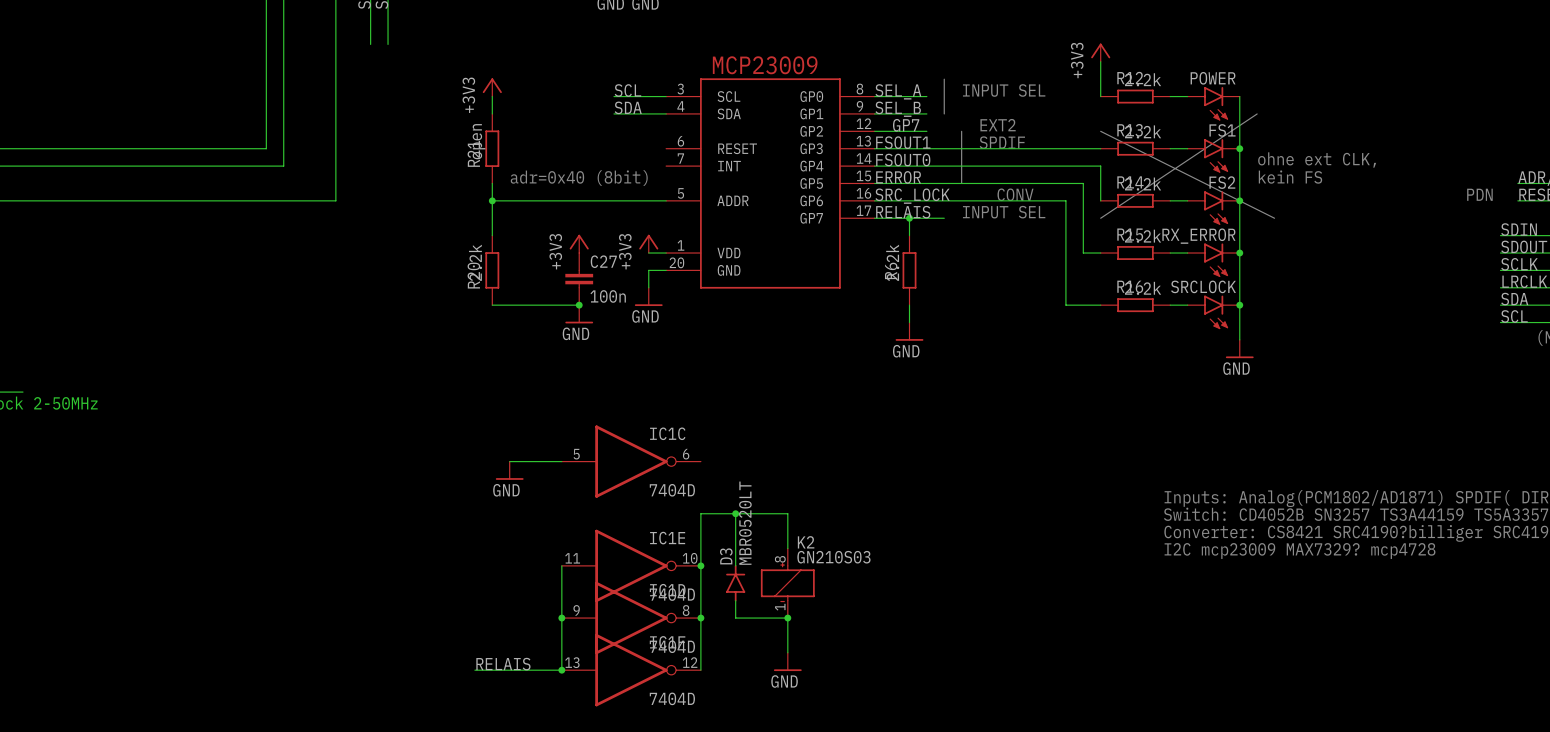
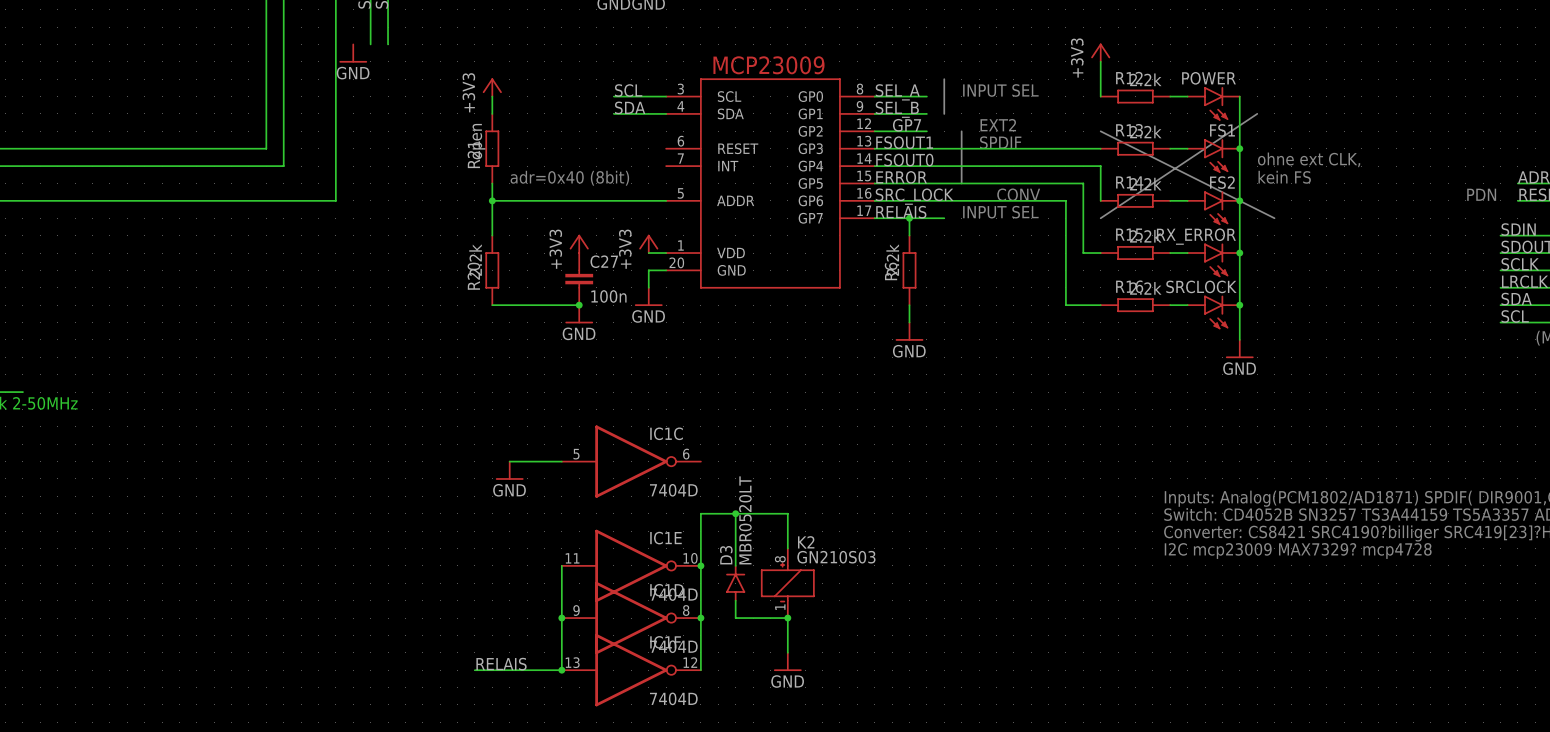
power symbol: none -> GND (353, 53)

